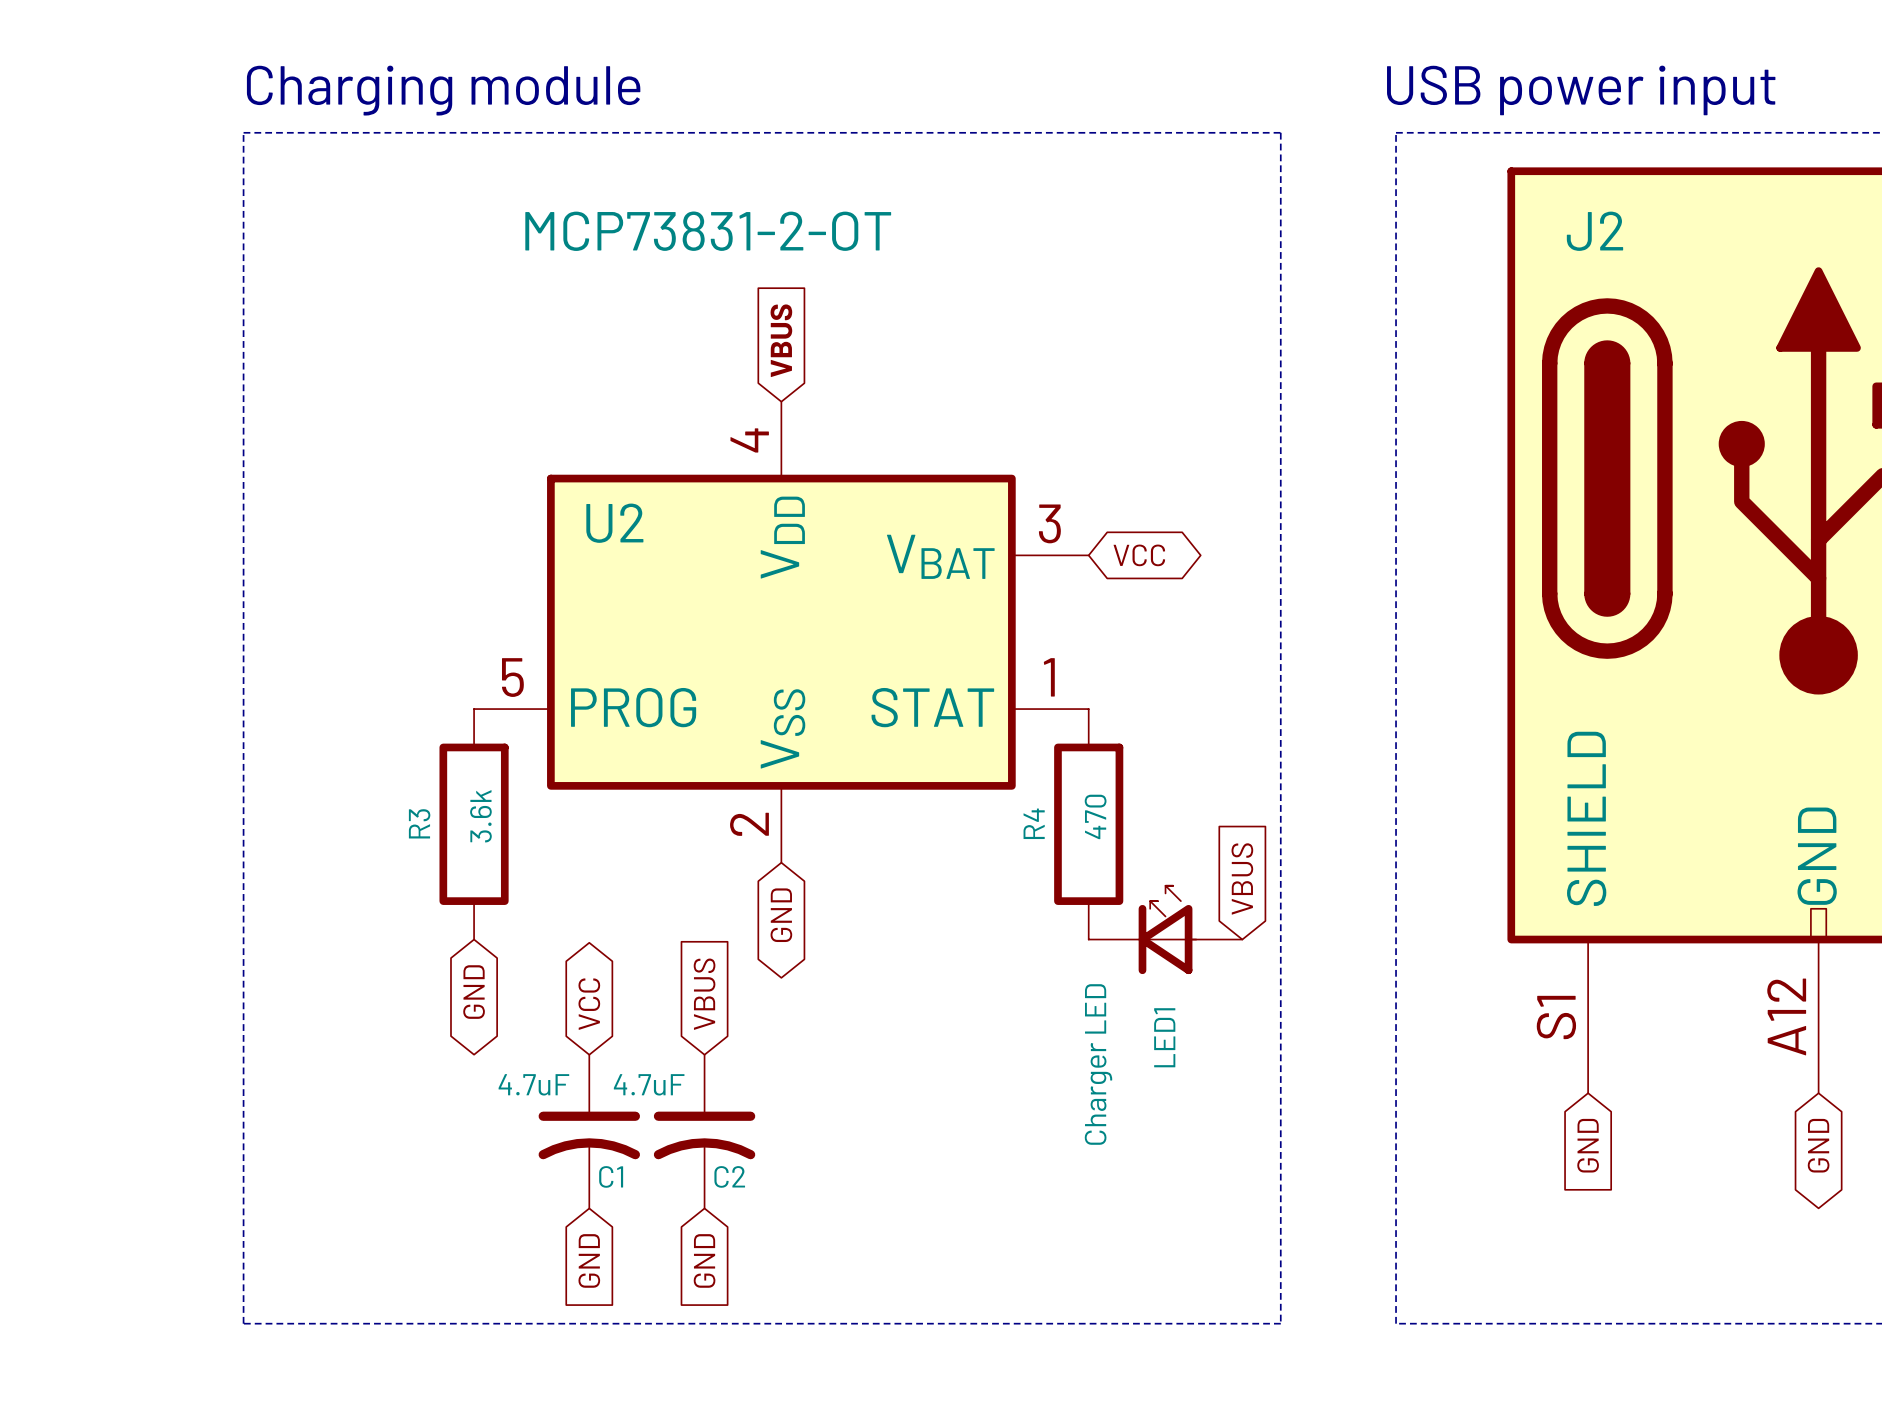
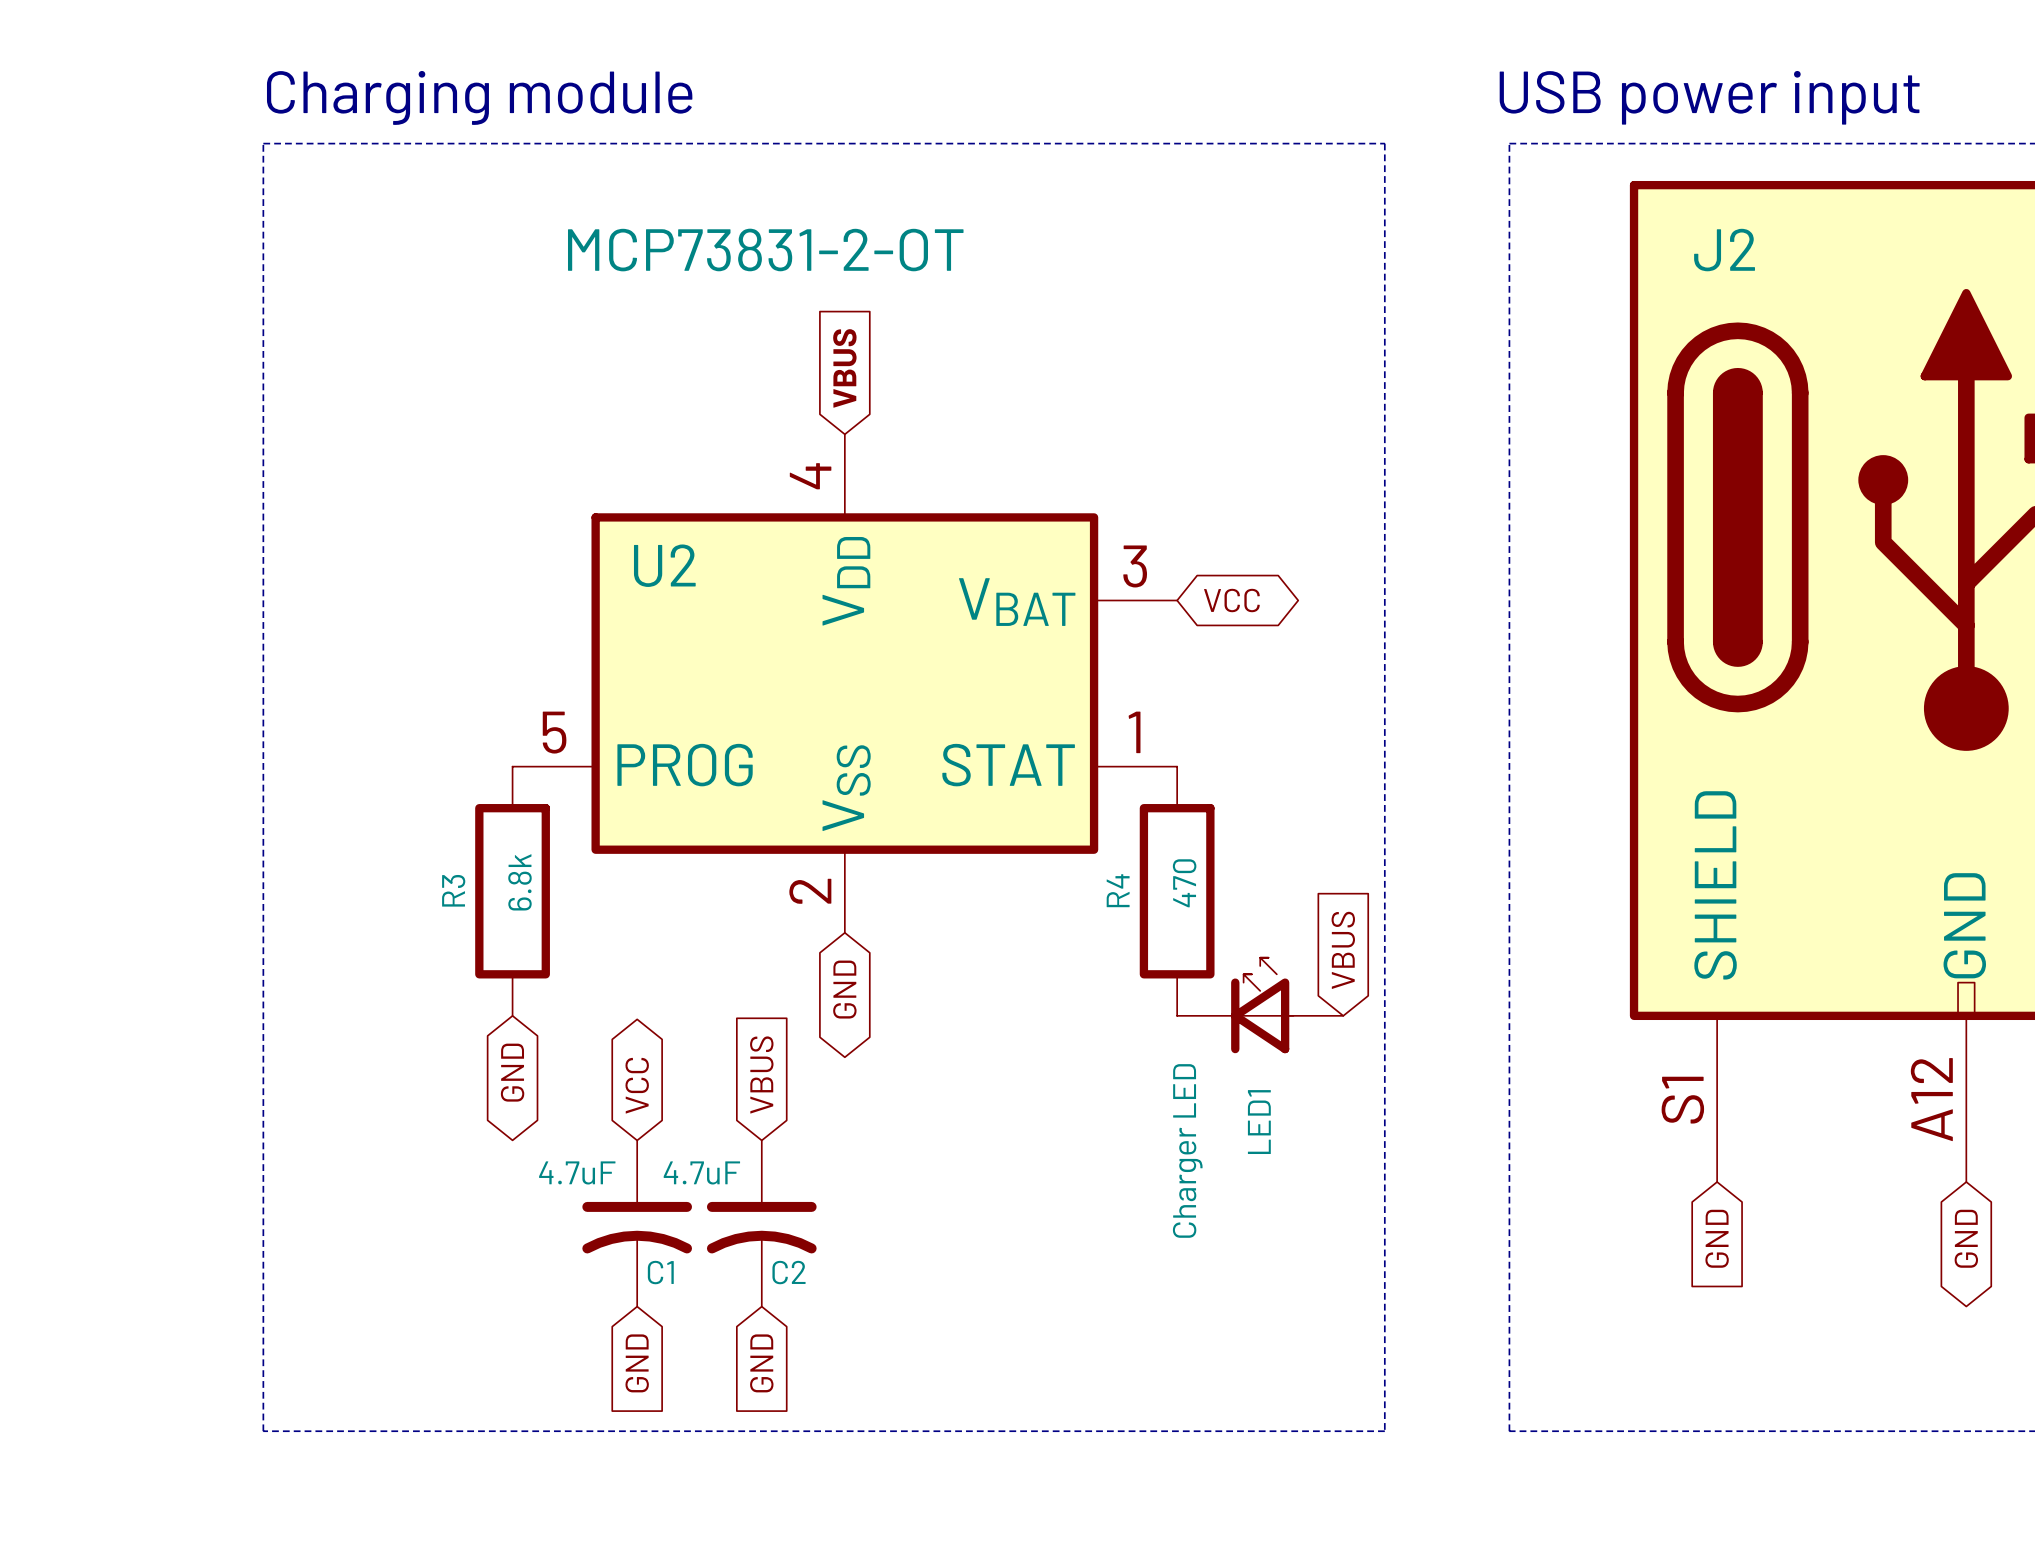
R3 value: 3.6k (480, 816) -> 6.8k (519, 882)

